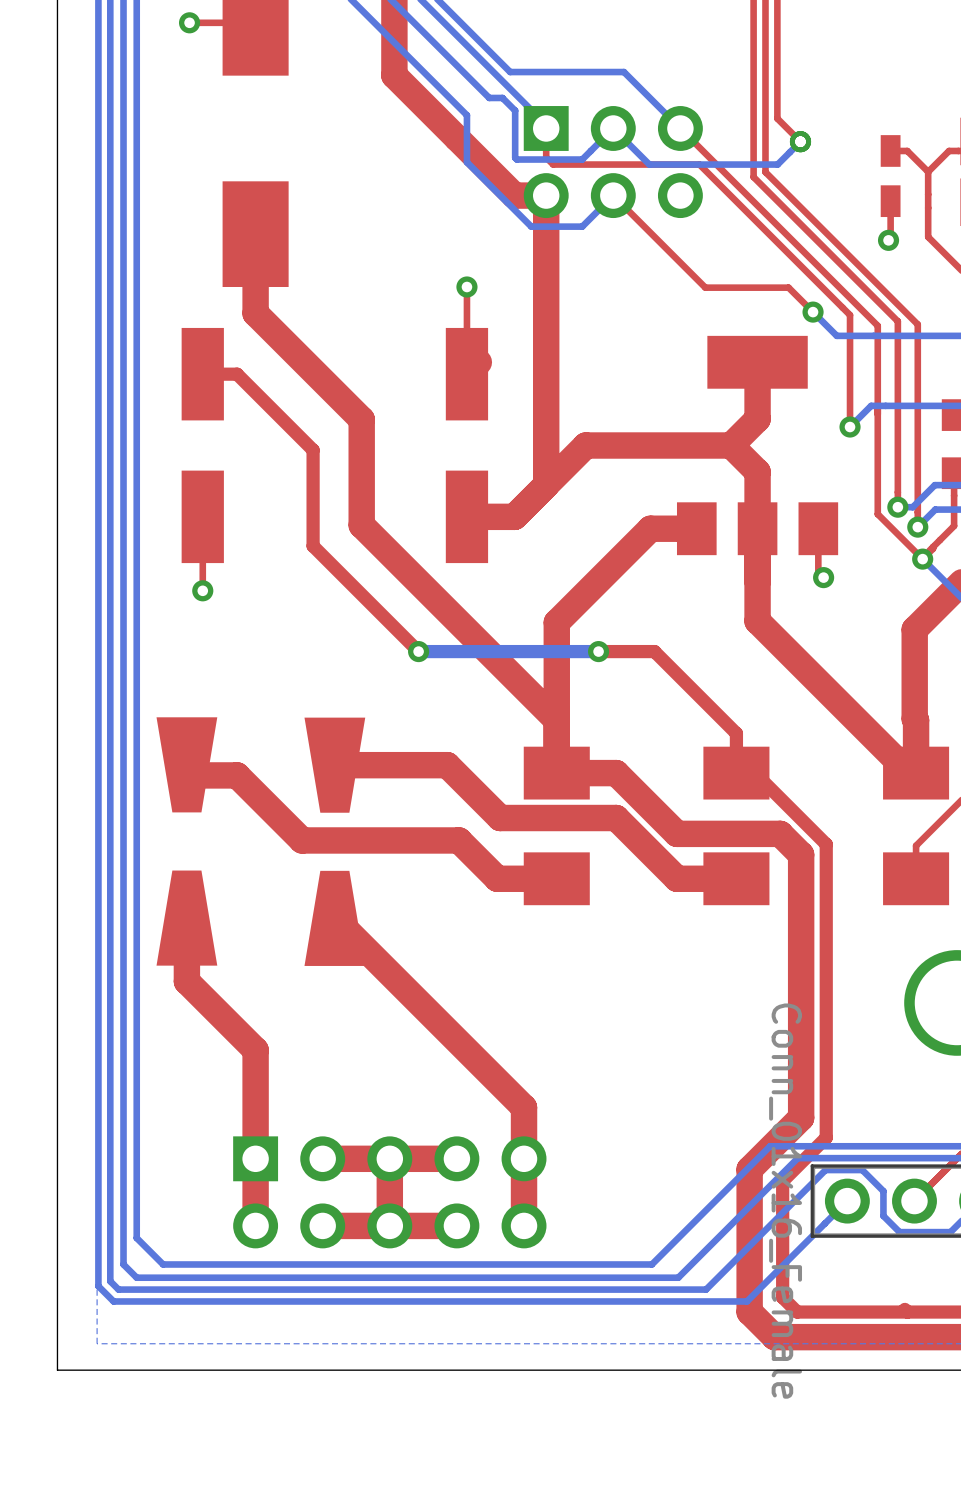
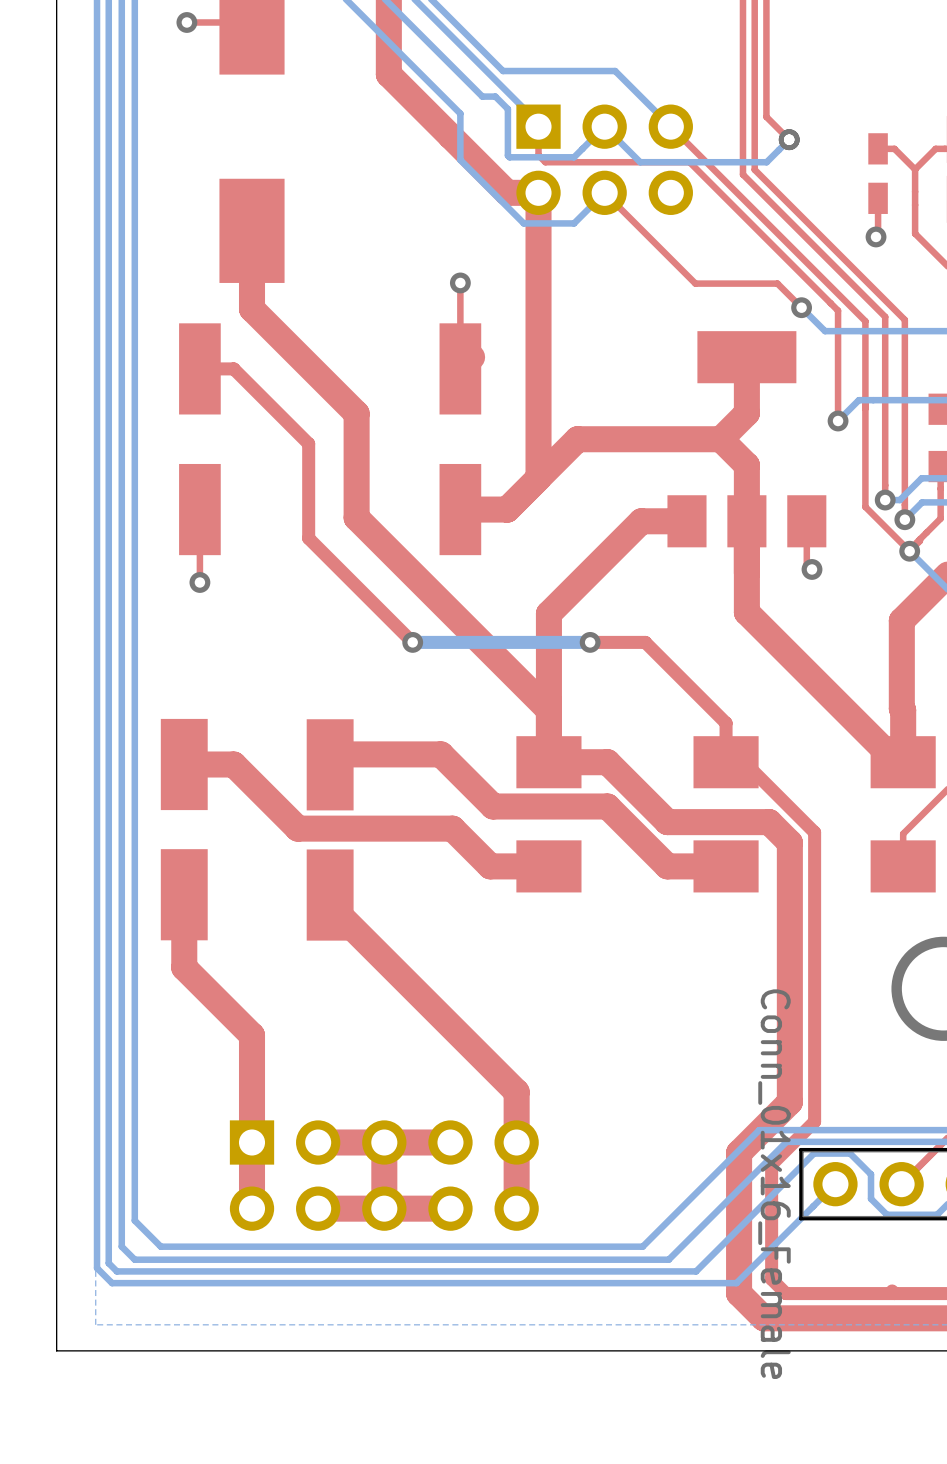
part footprint: [156, 717, 218, 966] -> [160, 718, 208, 941]
part footprint: [304, 717, 366, 966] -> [306, 719, 354, 941]

